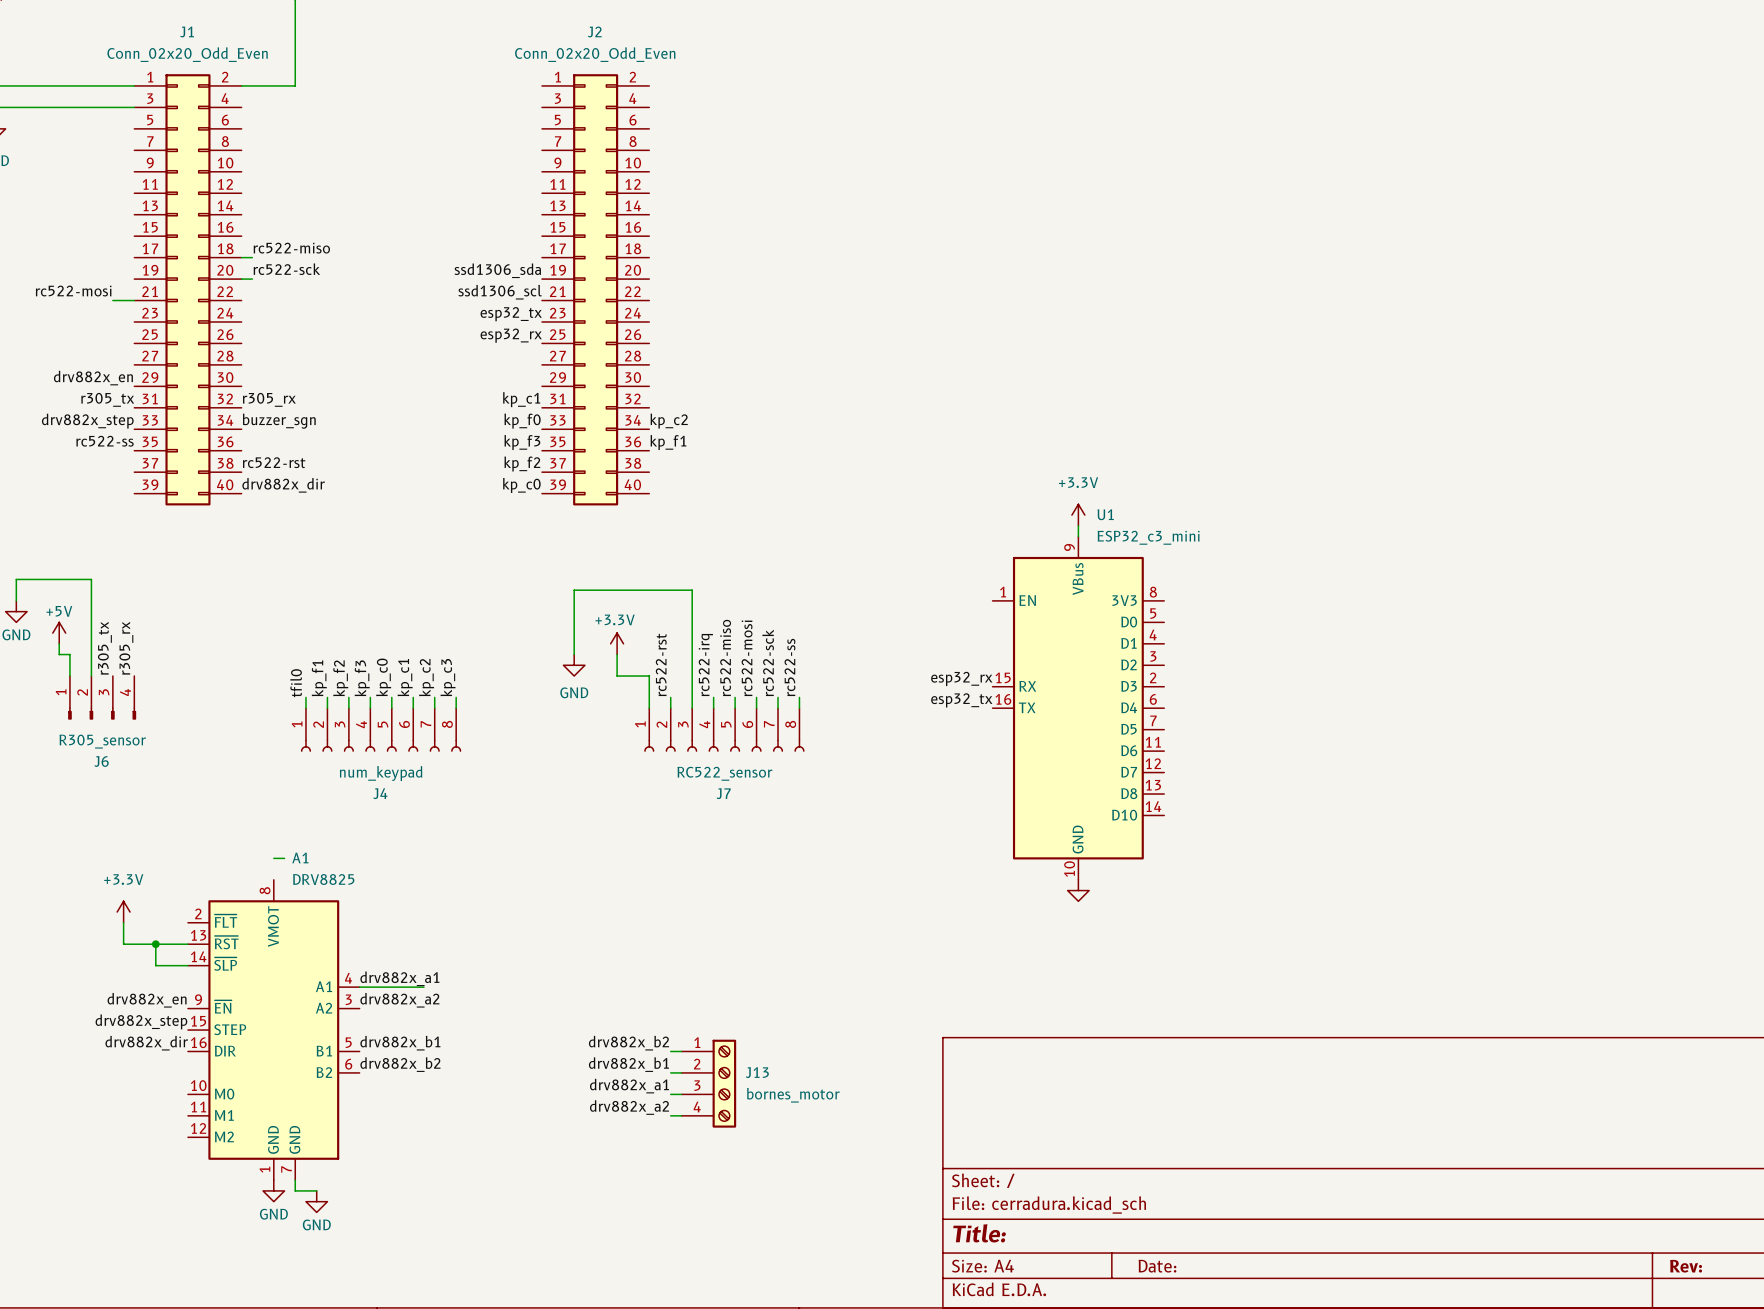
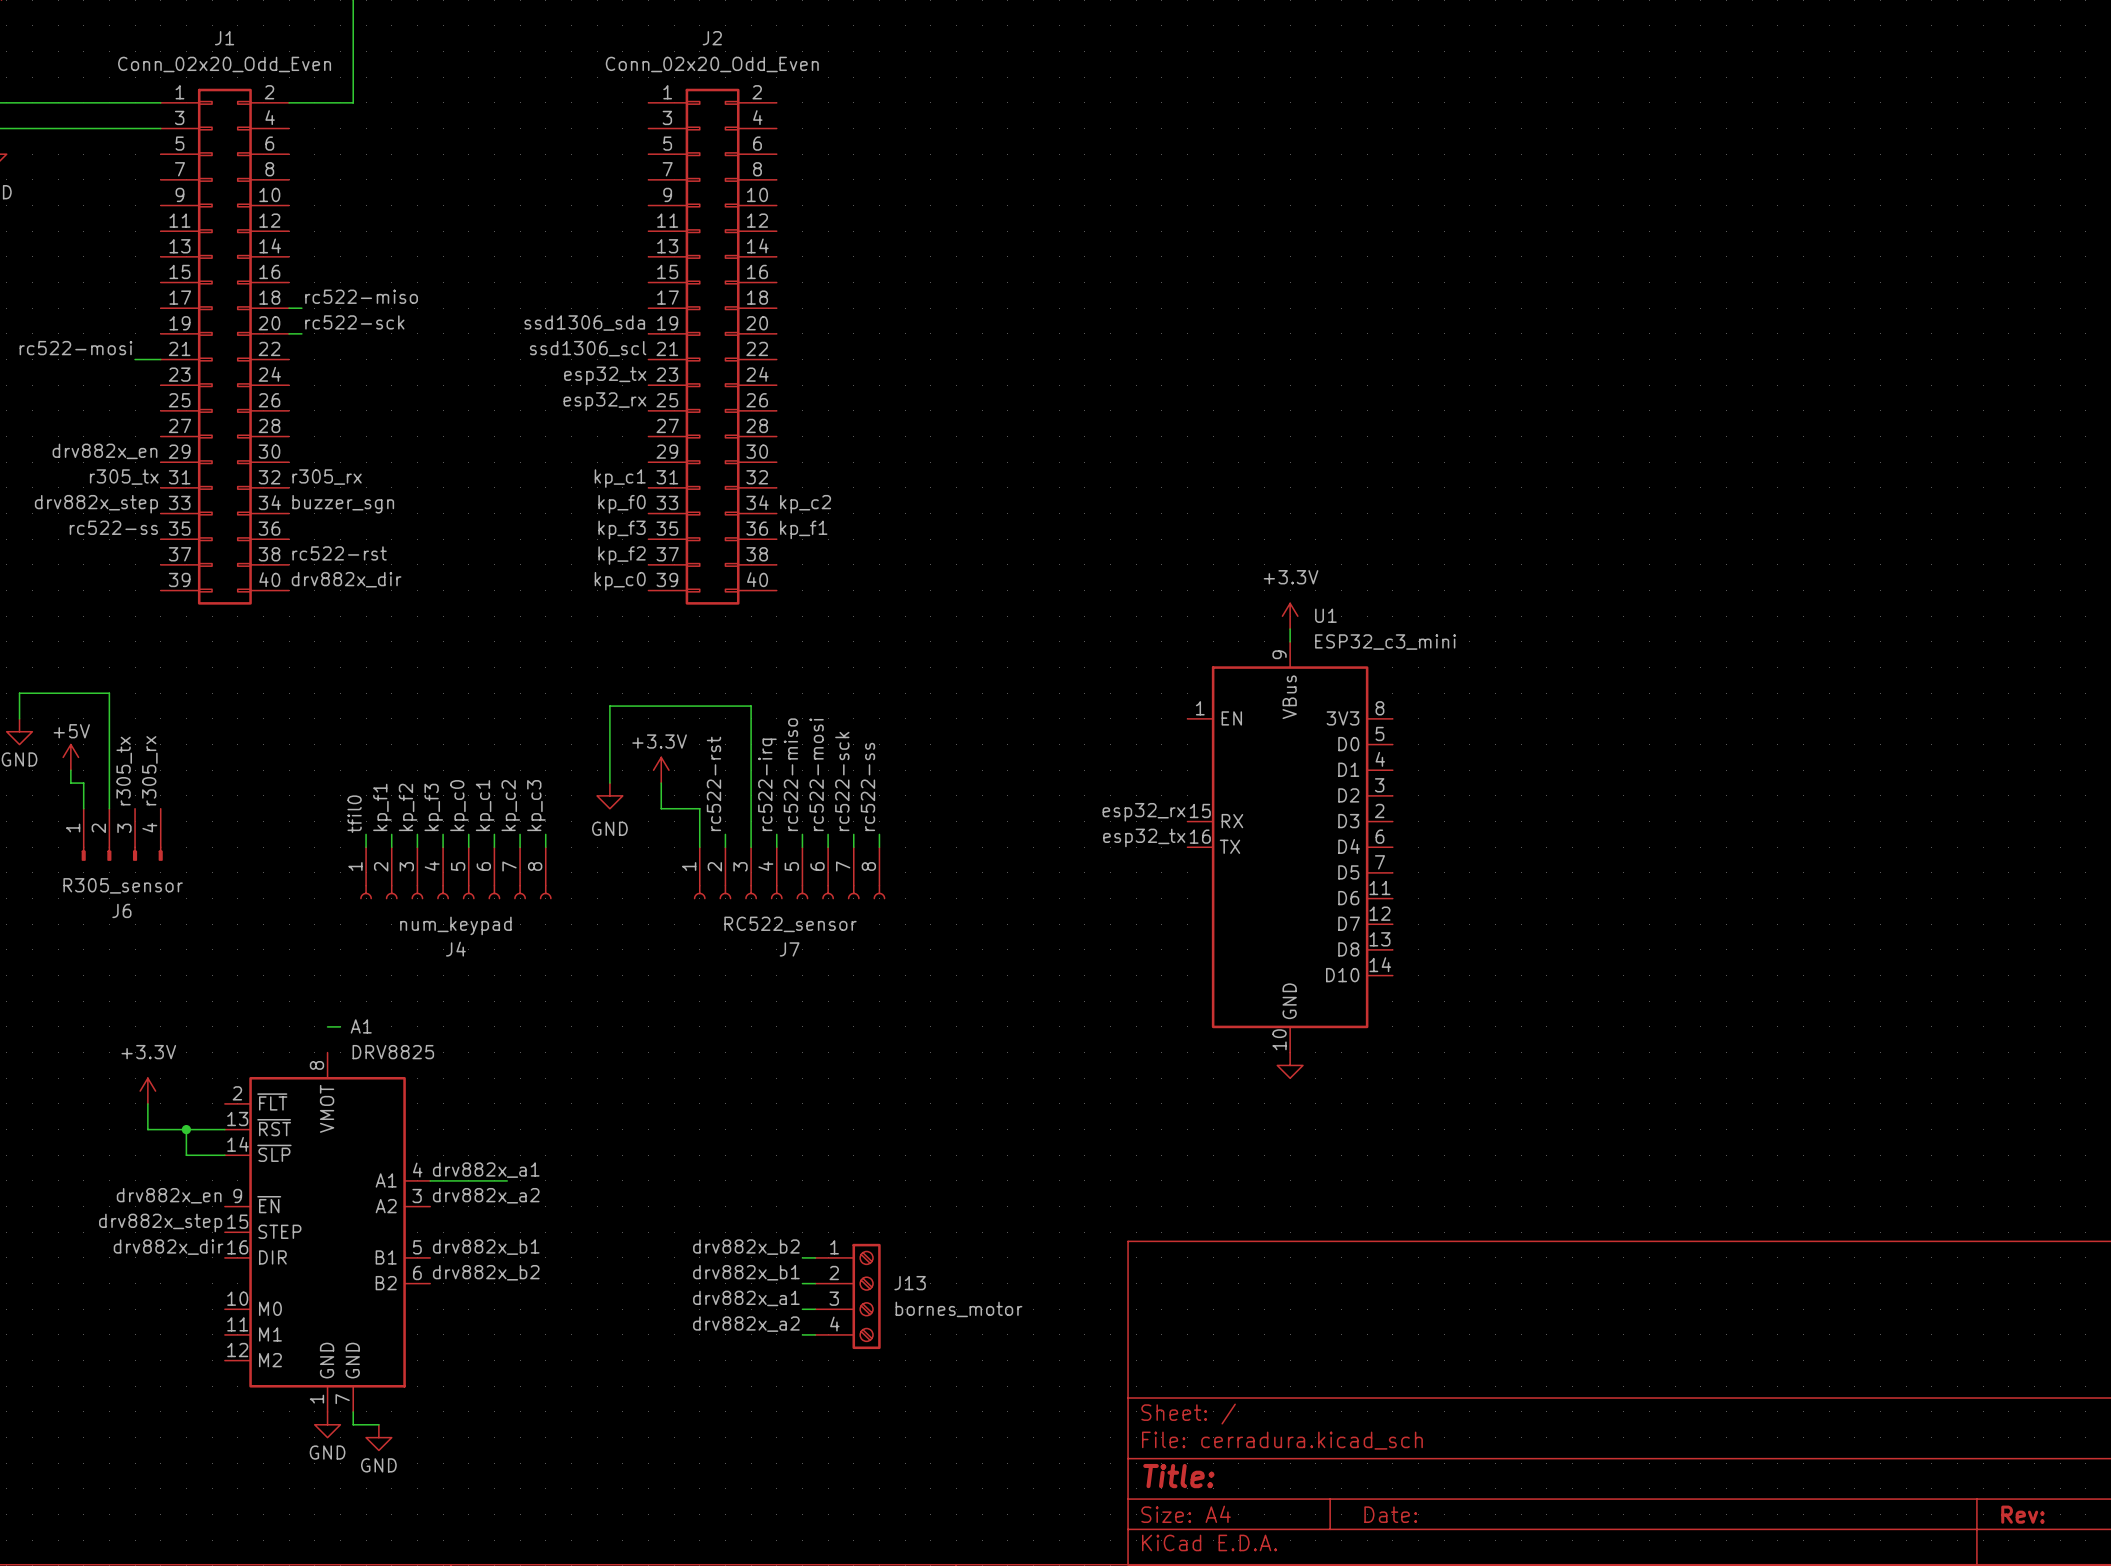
wire: (574, 590) (574, 654) -> (686, 706) (609, 706) (609, 783)
wire: (627, 590) (692, 590) (692, 697) -> (751, 706) (751, 847)
power symbol position: +3.3V (617, 643) -> +3.3V (661, 770)
wire: none -> (661, 783) (661, 808) (699, 808) (699, 847)
wire: (617, 654) (617, 676) (649, 676) (649, 697) -> none
label: rc522-miso (725, 657) -> rc522-ss (867, 786)
label position: rc522-mosi (747, 658) -> rc522-mosi (816, 774)
label: rc522-sck (768, 662) -> none
label: none -> rc522-rst (713, 783)
label: rc522-rst (661, 664) -> rc522-miso (790, 774)
power symbol position: GND (574, 665) -> GND (609, 795)
label: none -> rc522-irq (767, 784)
label: rc522-irq (705, 665) -> rc522-sck (842, 781)
label: rc522-ss (789, 667) -> none
wire: (756, 697) (756, 708) -> (725, 834) (725, 847)
wire: (778, 697) (778, 708) -> none
wire: (799, 697) (799, 708) -> none
J7 position: (724, 729) -> (789, 873)

